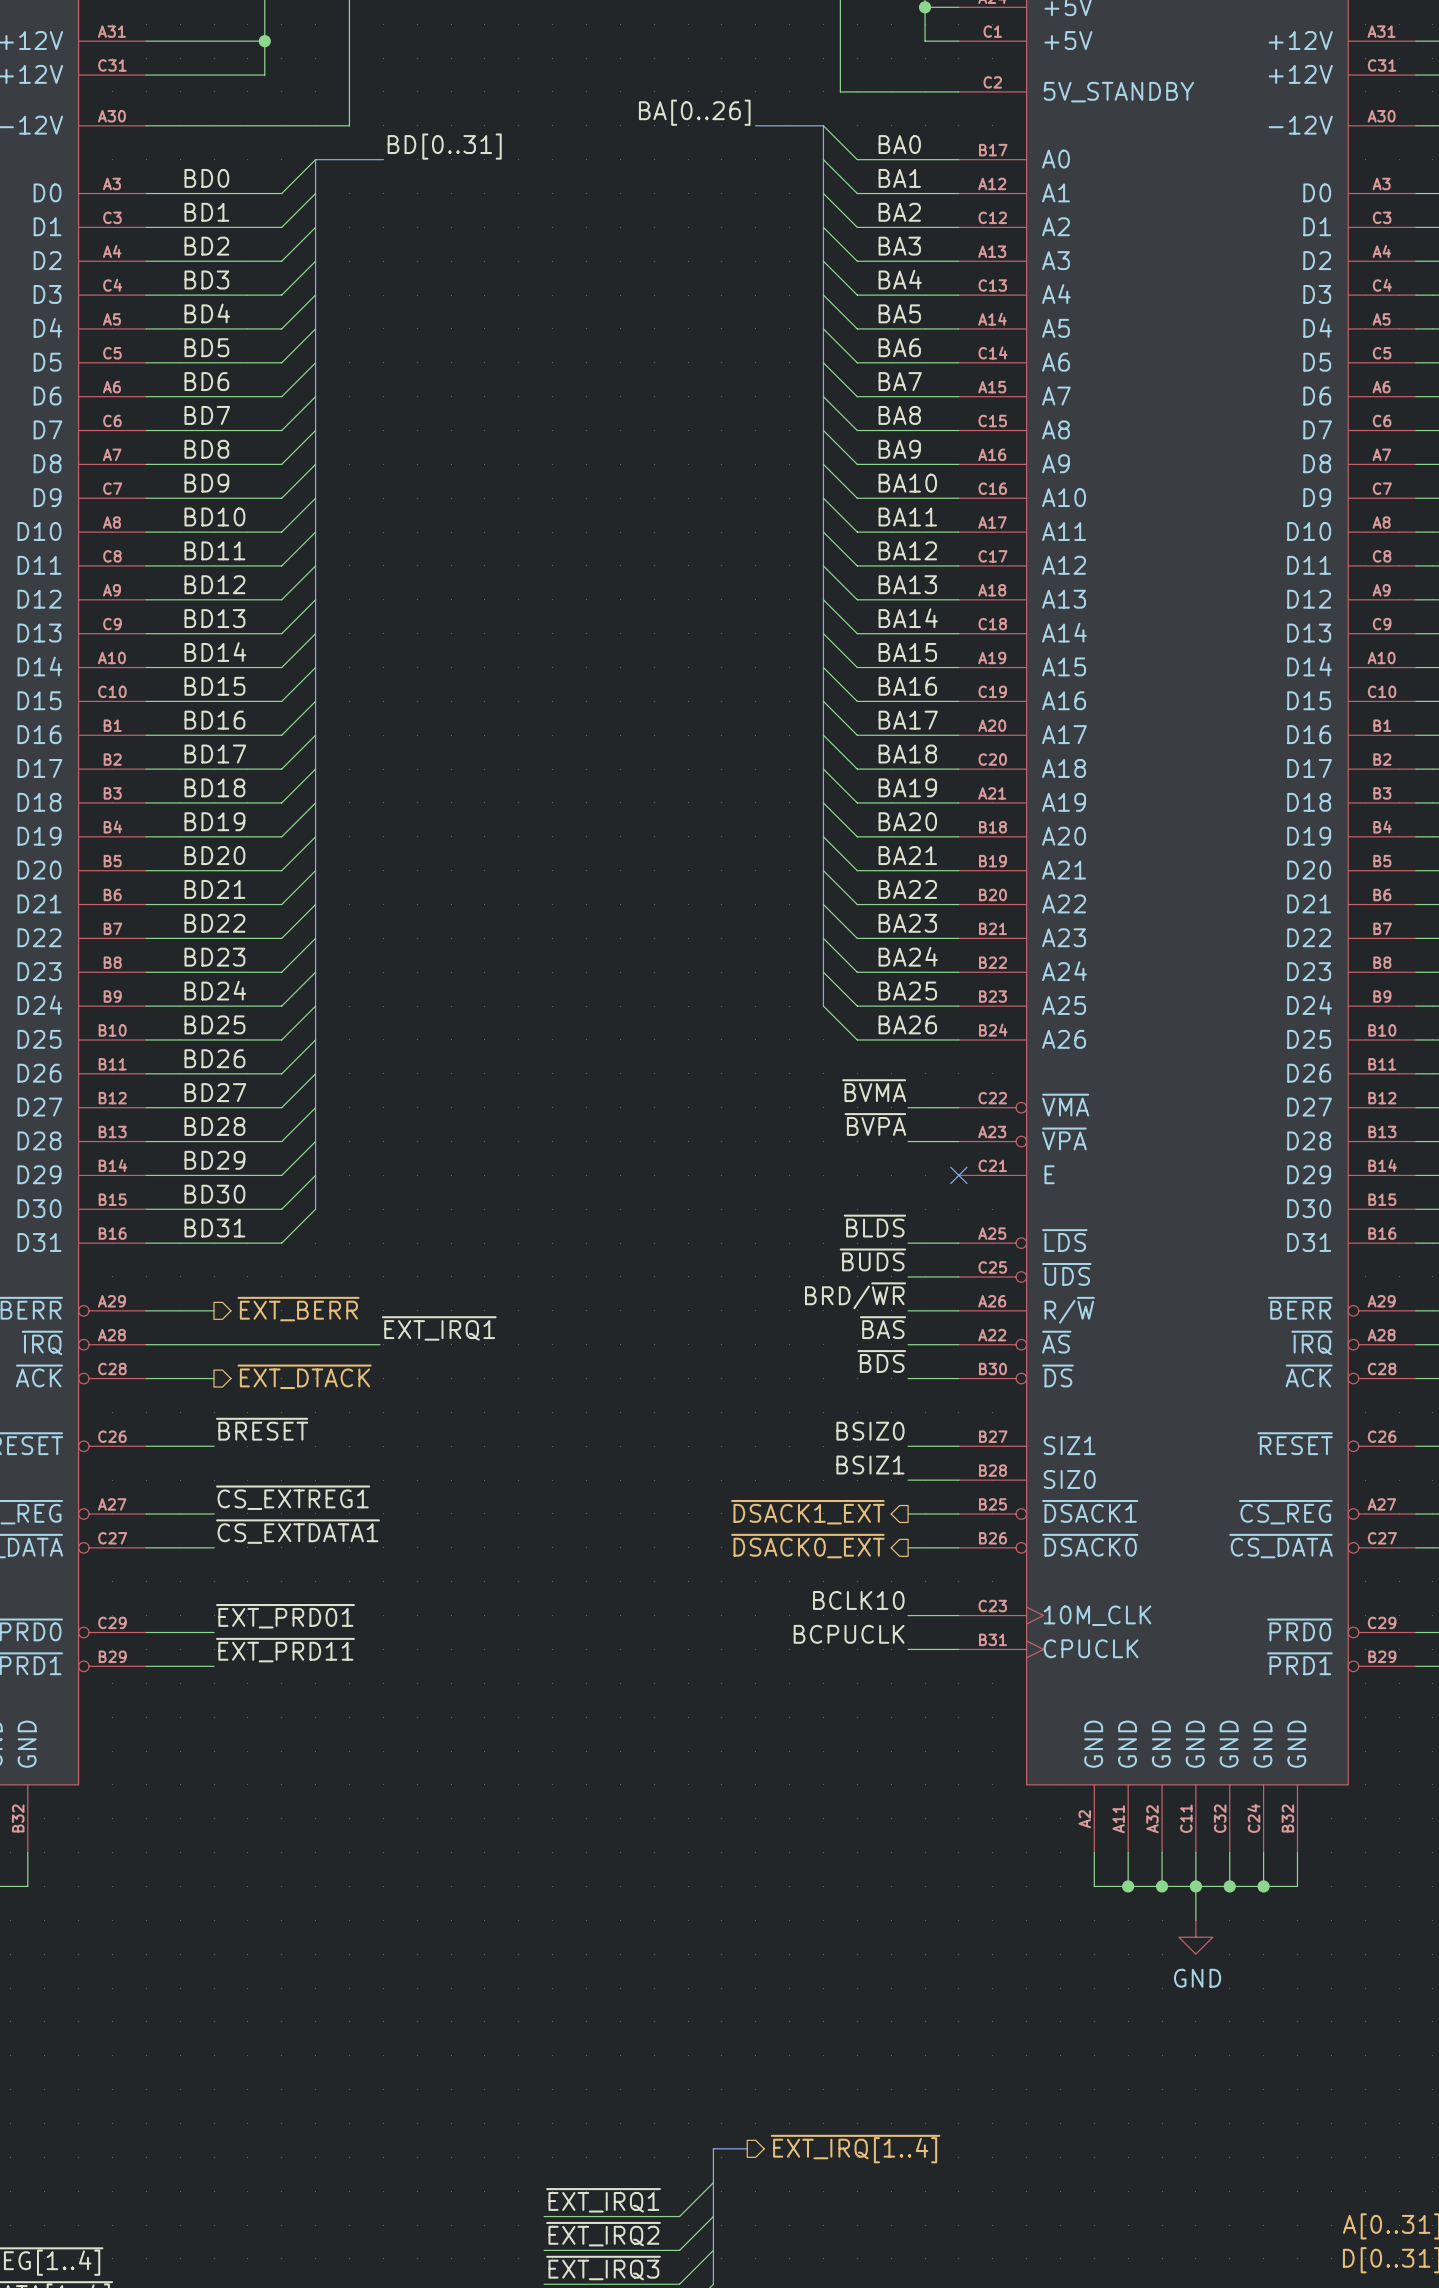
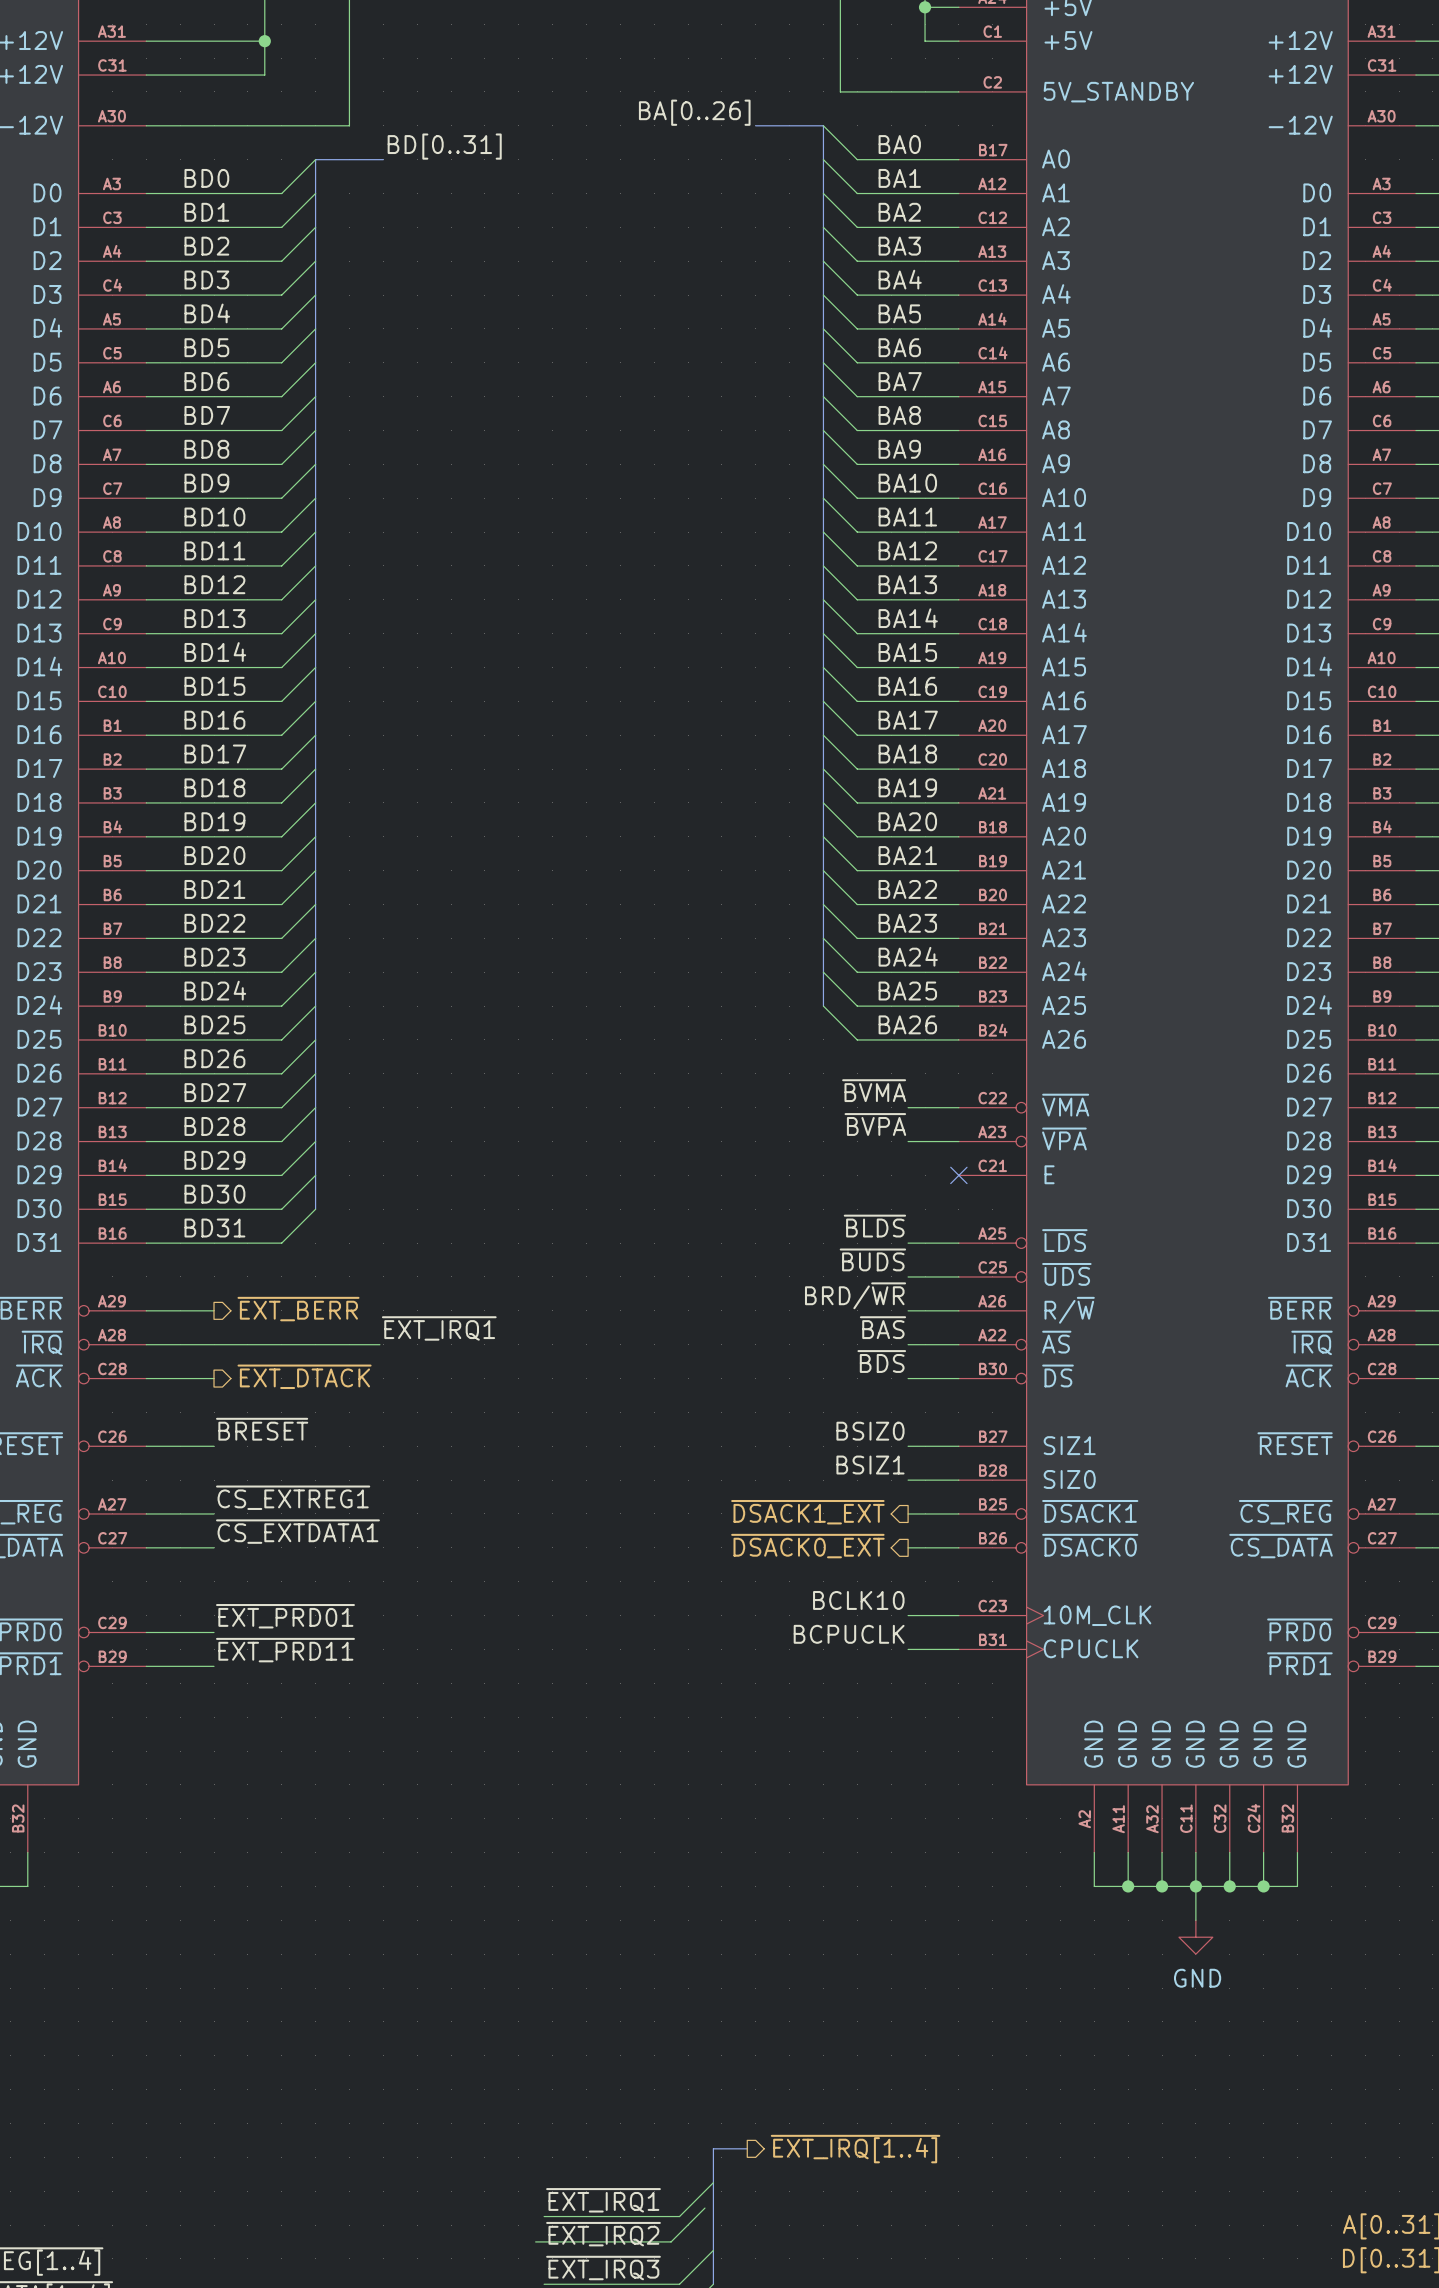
wire: none -> (704, 2208) (671, 2241) (535, 2241)
wire: (713, 2216) (679, 2250) -> none
wire: (544, 2250) (679, 2250) -> none

